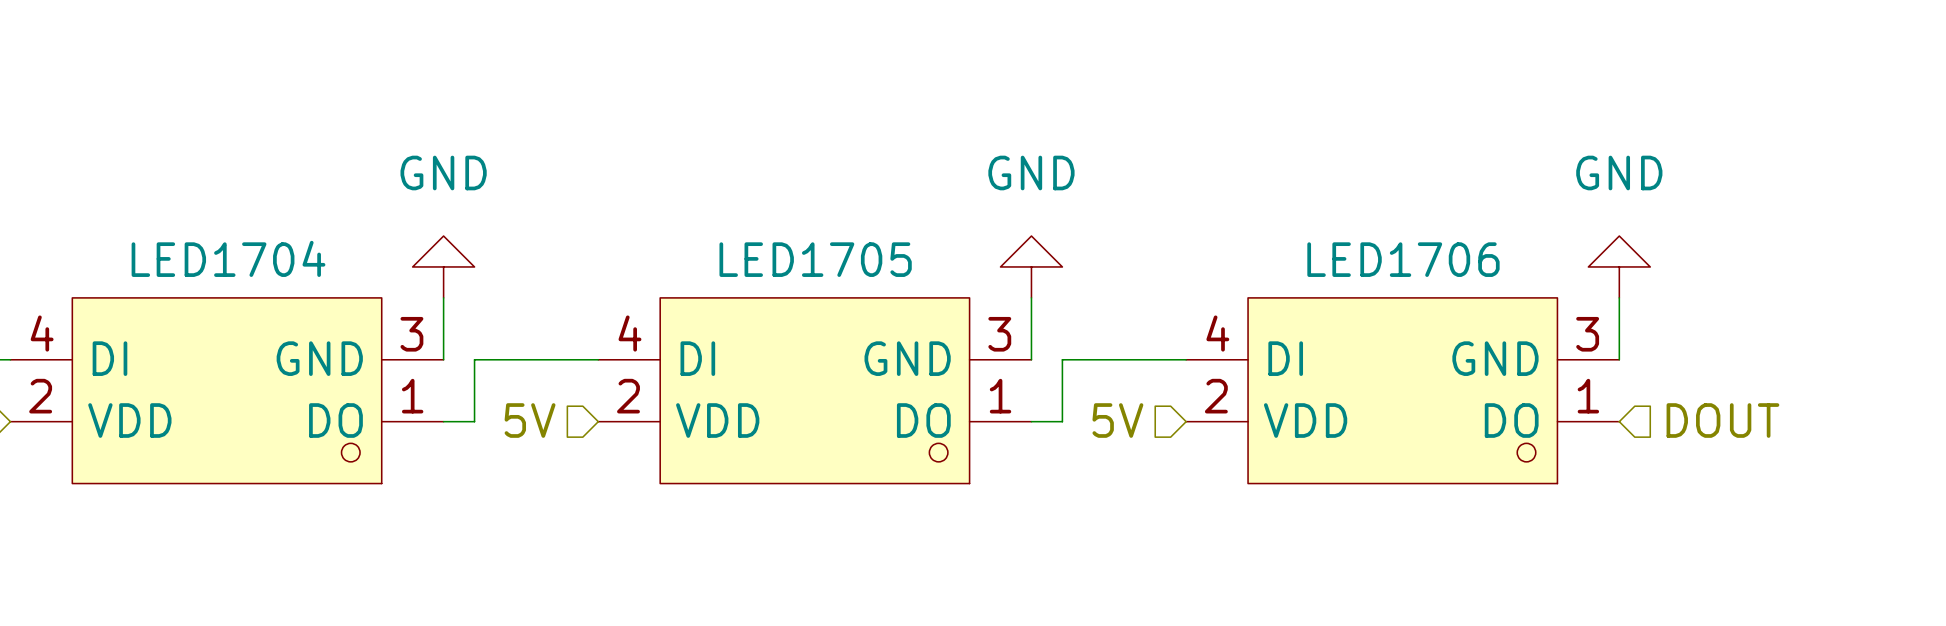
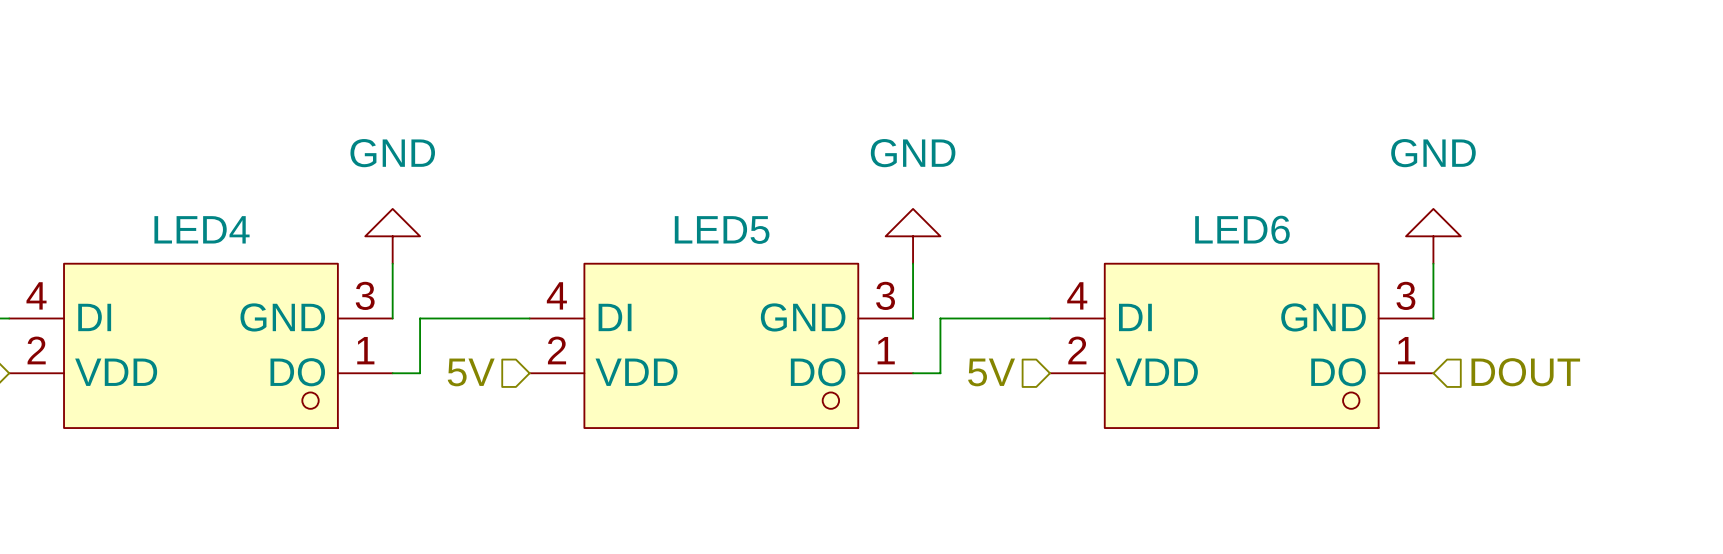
LED1704 name: LED1704 (228, 258) -> LED4 (202, 229)
LED1705 name: LED1705 (815, 259) -> LED5 (722, 230)
LED1706 name: LED1706 (1403, 259) -> LED6 (1242, 229)

